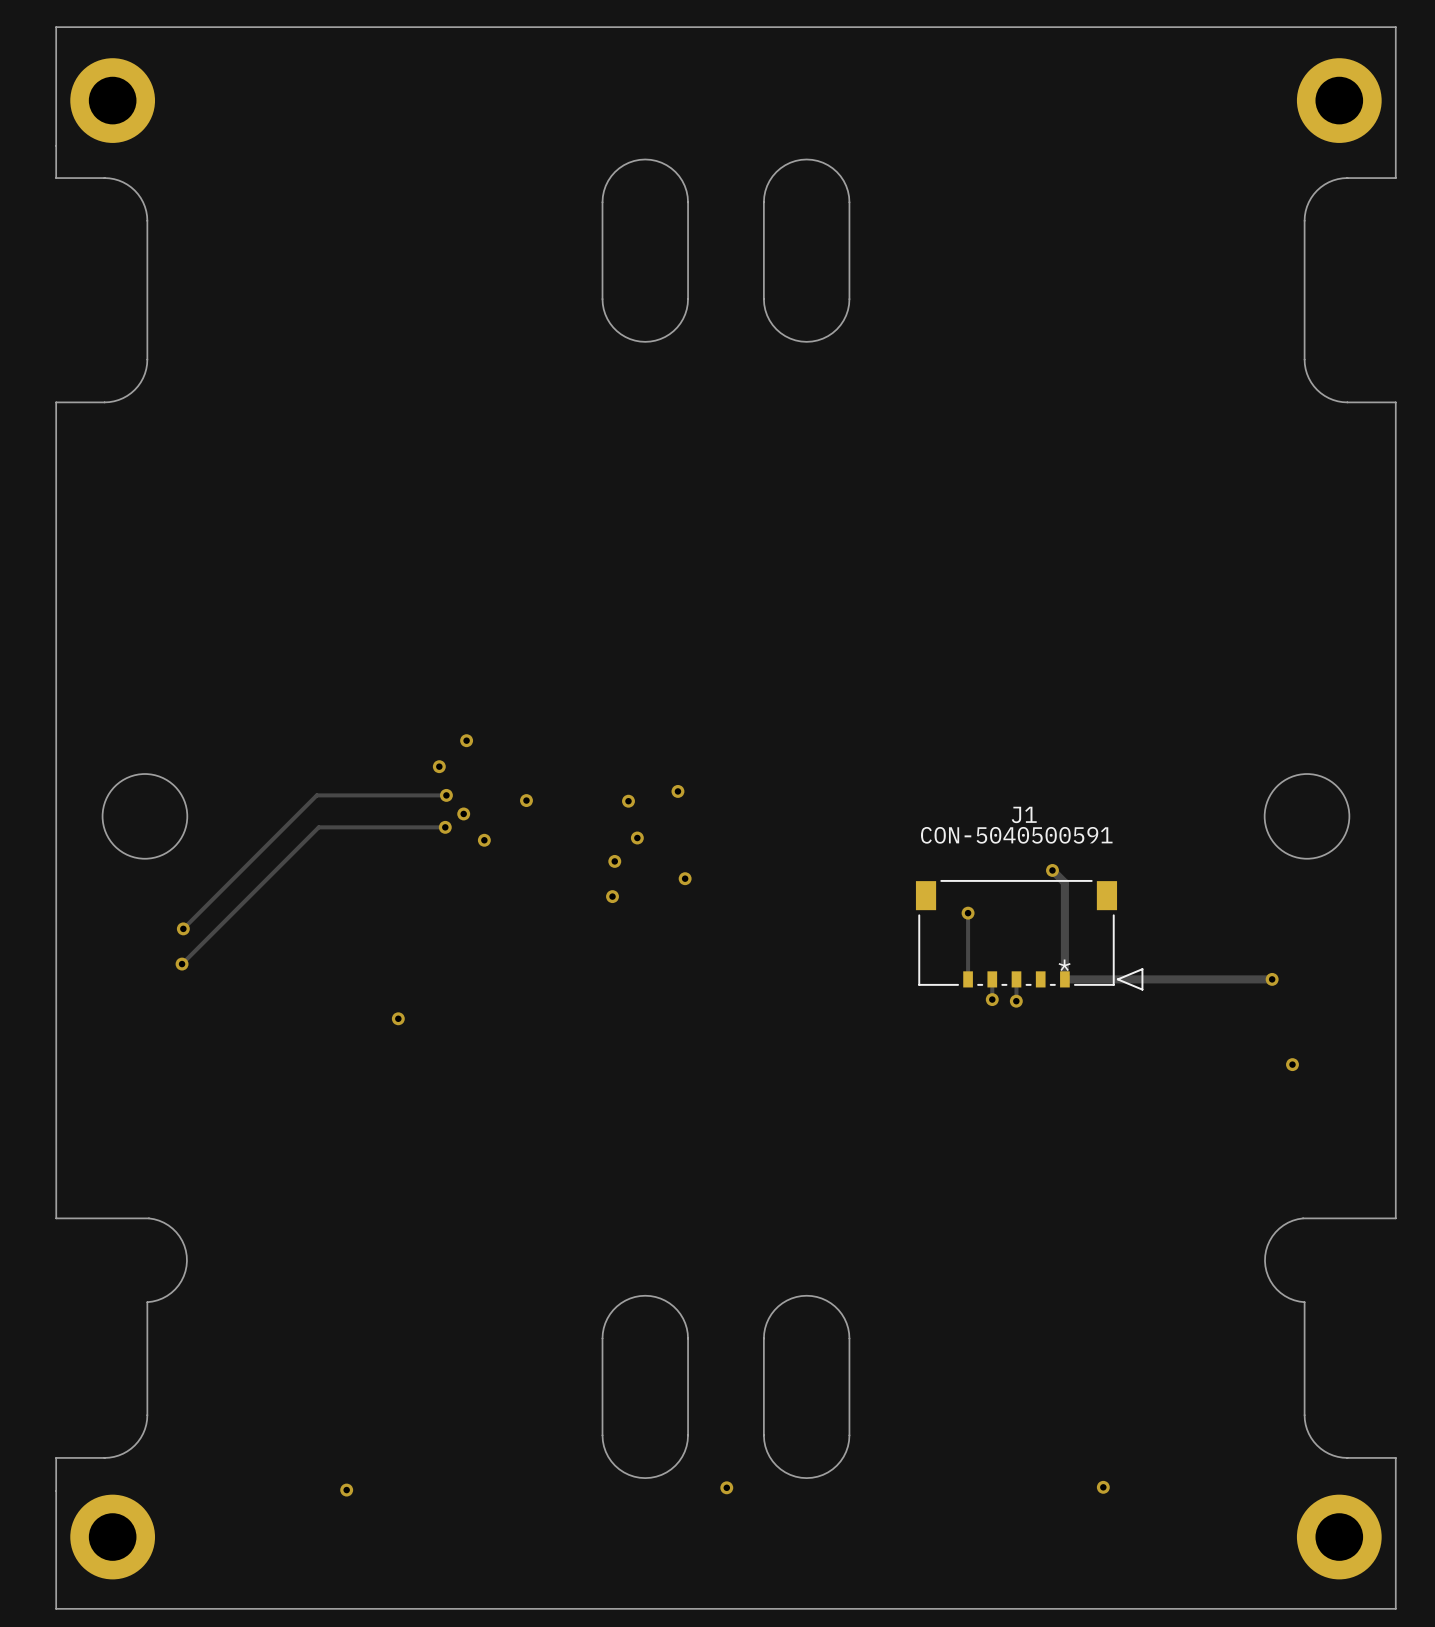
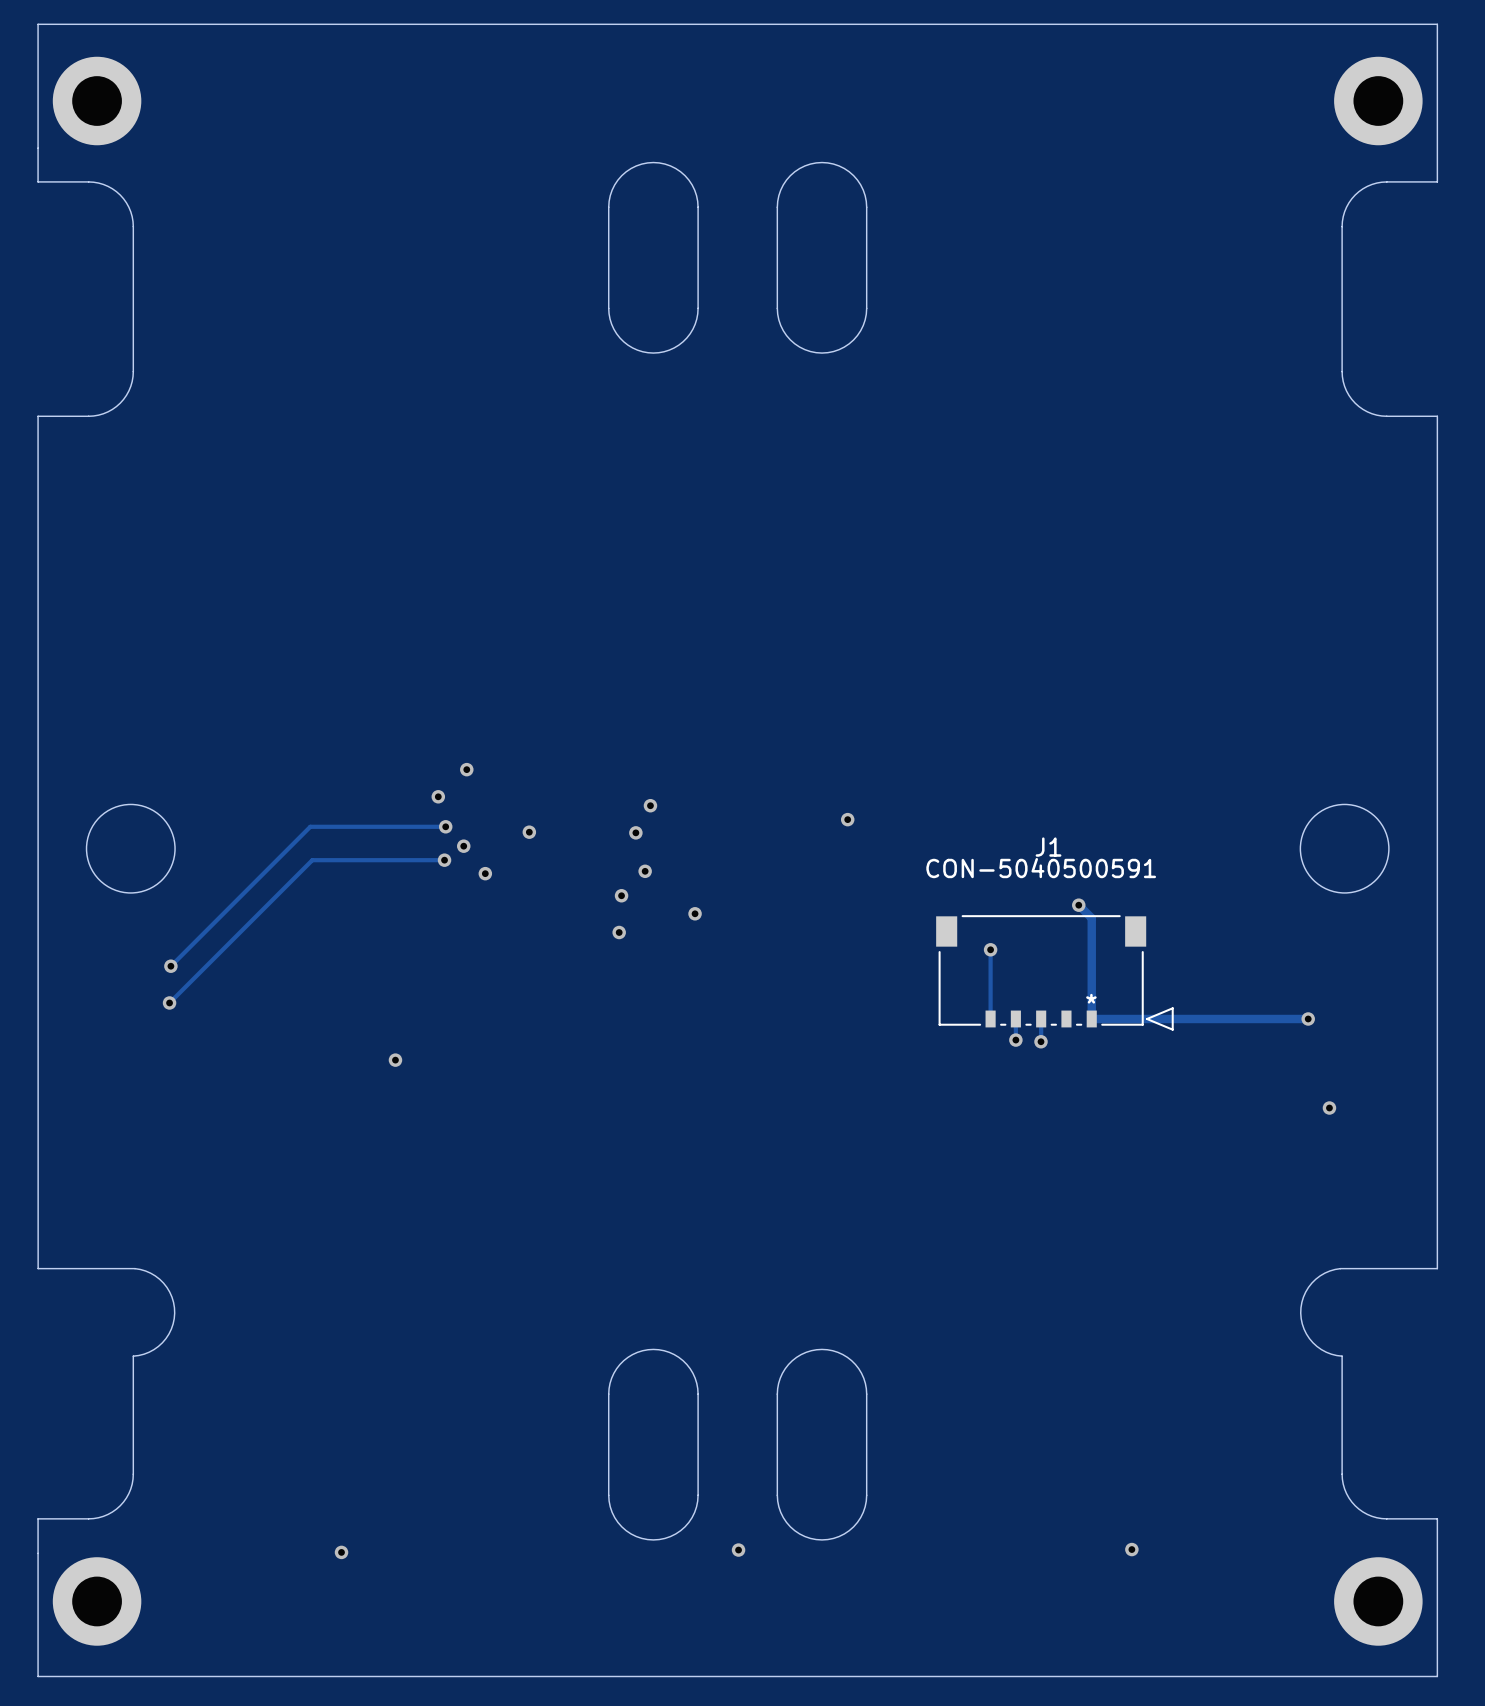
via: none -> (847, 819)
via position: (677, 791) -> (650, 805)

